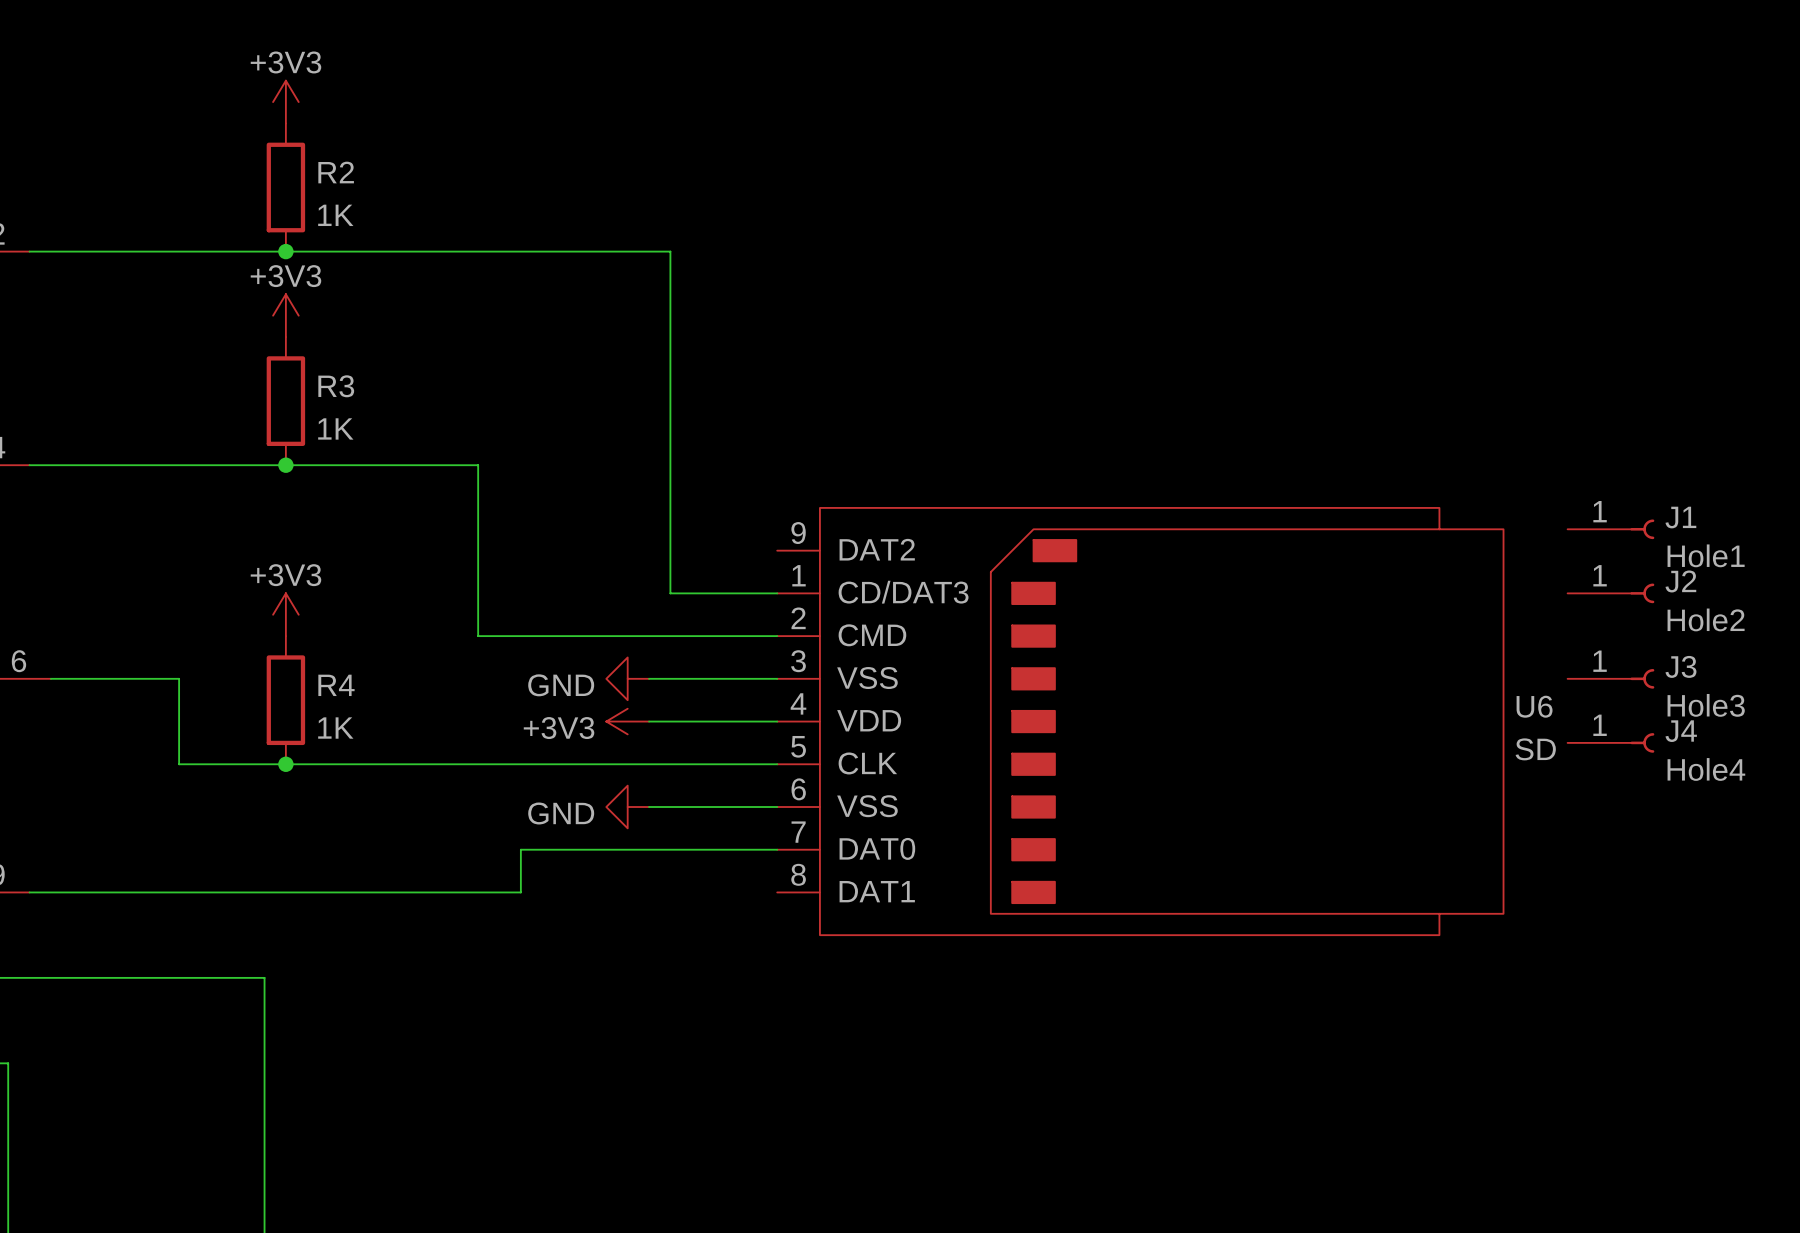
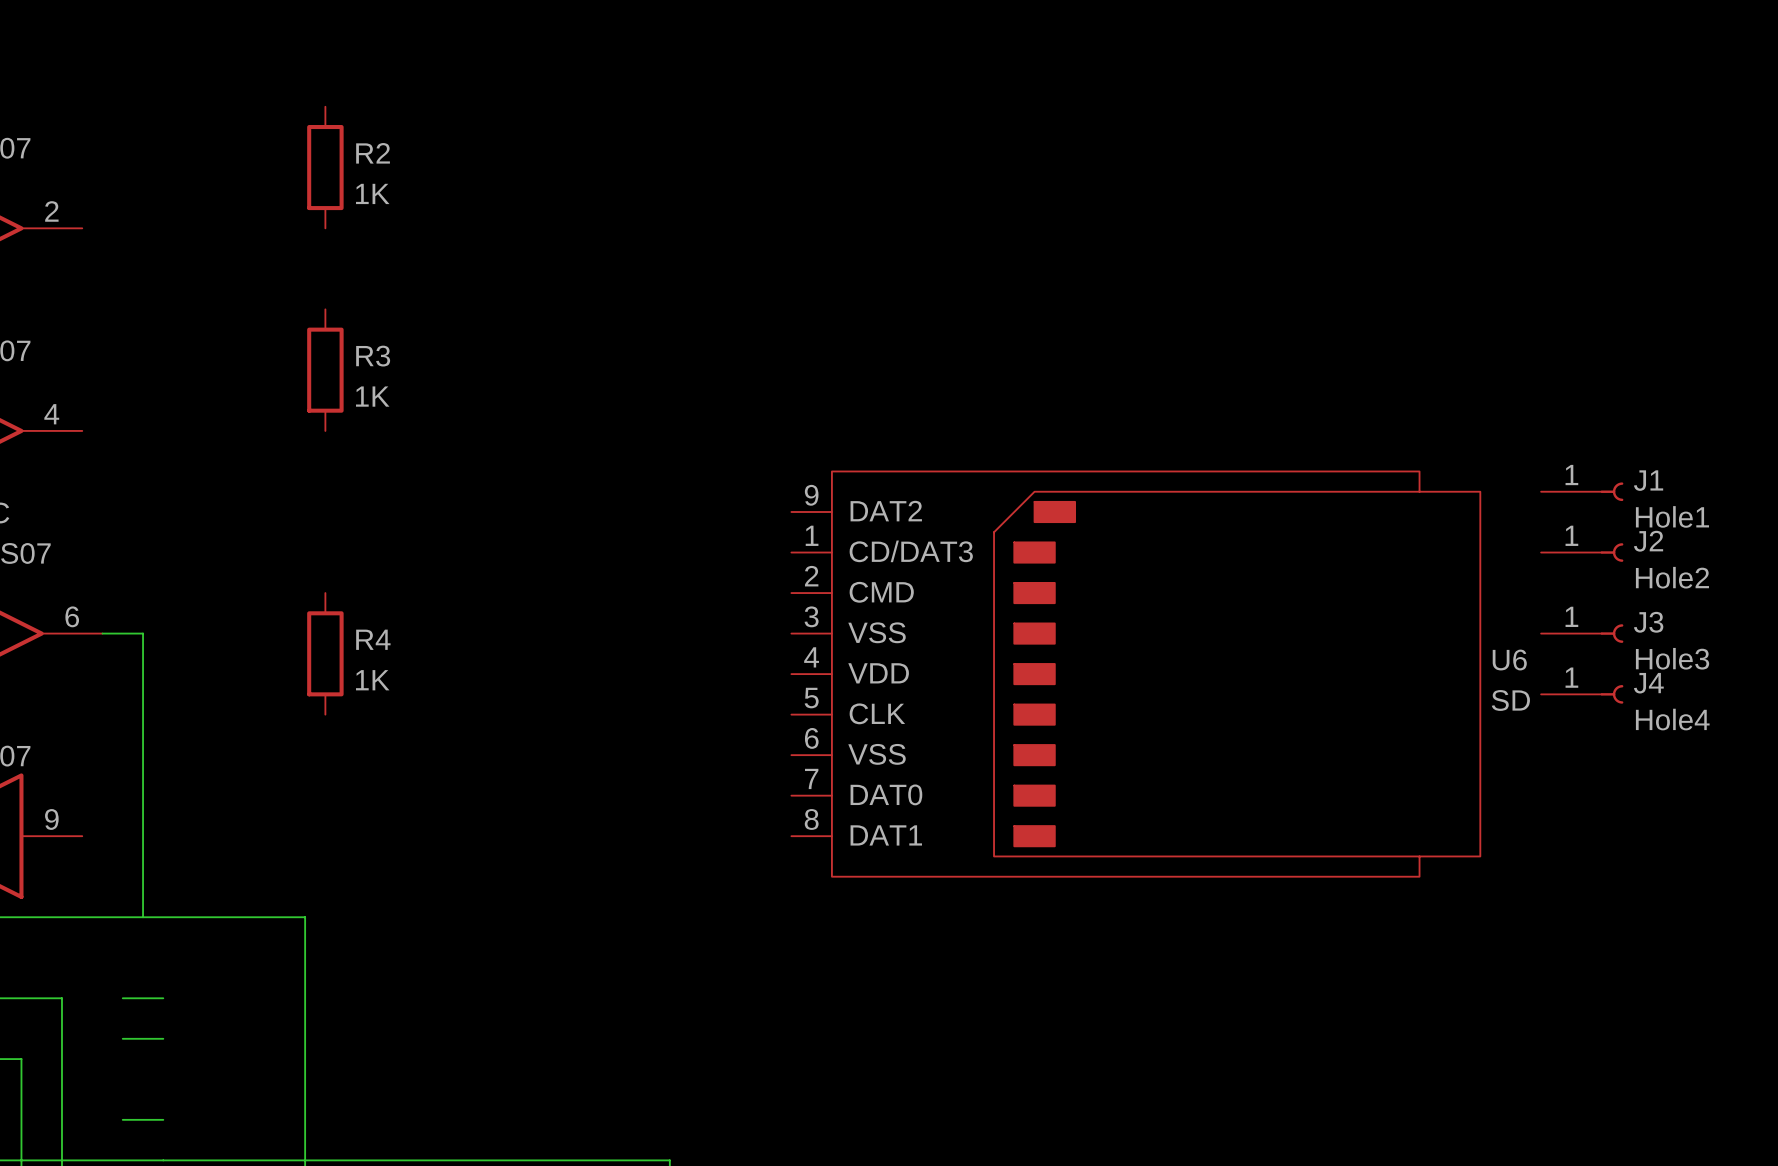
power symbol: +3V3 (285, 102) -> none
wire: (29, 251) (670, 251) (670, 593) (777, 593) -> none
junction: (285, 251) -> none
power symbol: +3V3 (285, 315) -> none
wire: (29, 465) (478, 465) (478, 636) (777, 636) -> none
junction: (285, 465) -> none
power symbol: +3V3 (285, 614) -> none
wire: (93, 678) (179, 678) (179, 764) (777, 764) -> (143, 633) (143, 917)
power symbol: GND (627, 678) -> none
wire: (649, 678) (777, 678) -> none
power symbol: +3V3 (627, 721) -> none
wire: (649, 721) (777, 721) -> none
junction: (285, 764) -> none
power symbol: GND (627, 807) -> none
wire: (649, 807) (777, 807) -> none
wire: (777, 849) (520, 849) (520, 892) (29, 892) -> none
wire: none -> (122, 998) (163, 998)
wire: none -> (122, 1038) (163, 1038)
wire: none -> (122, 1119) (163, 1119)

